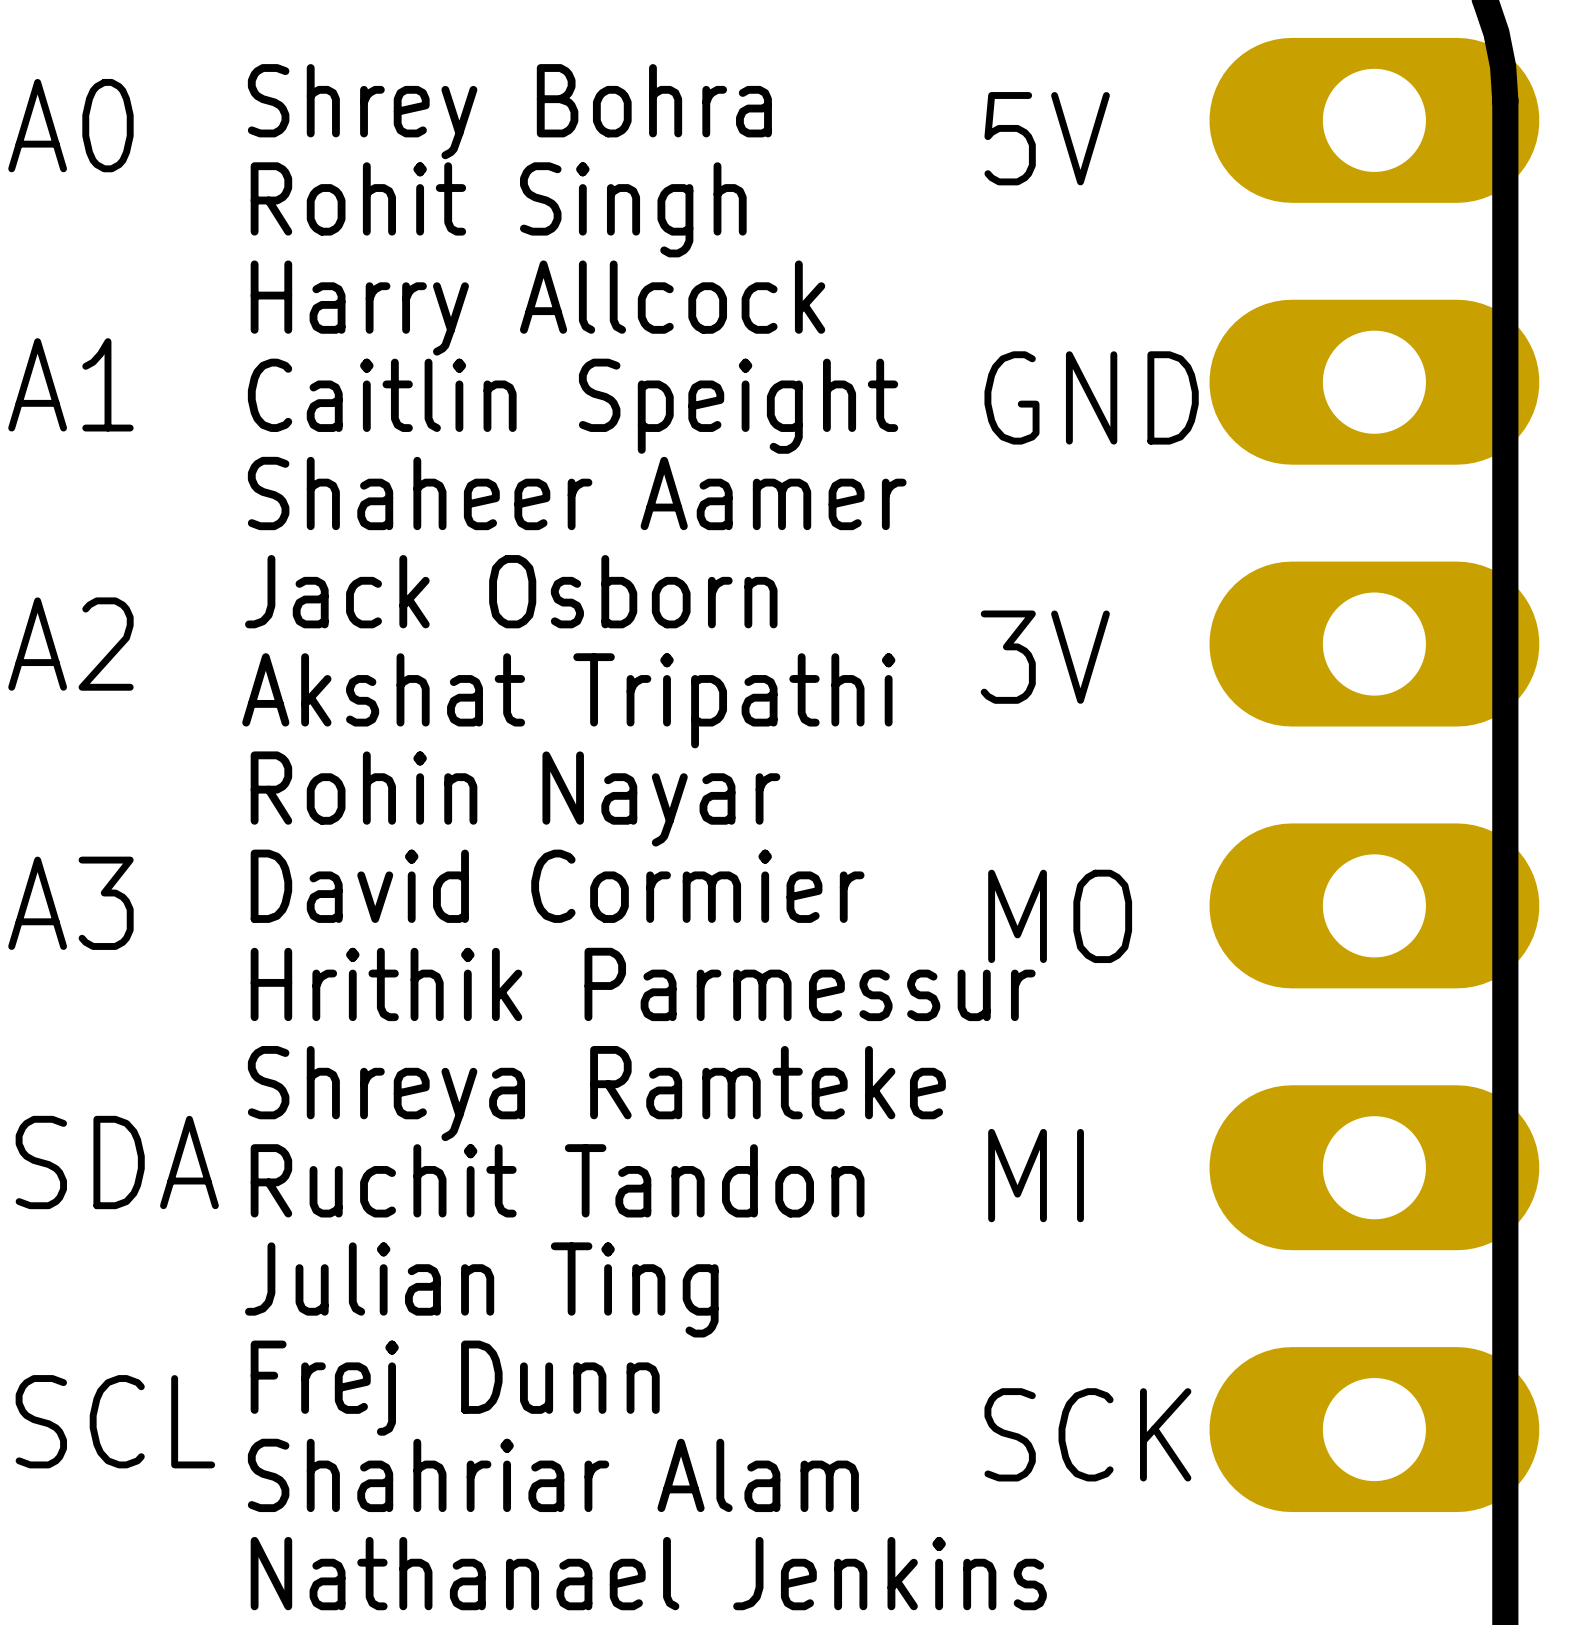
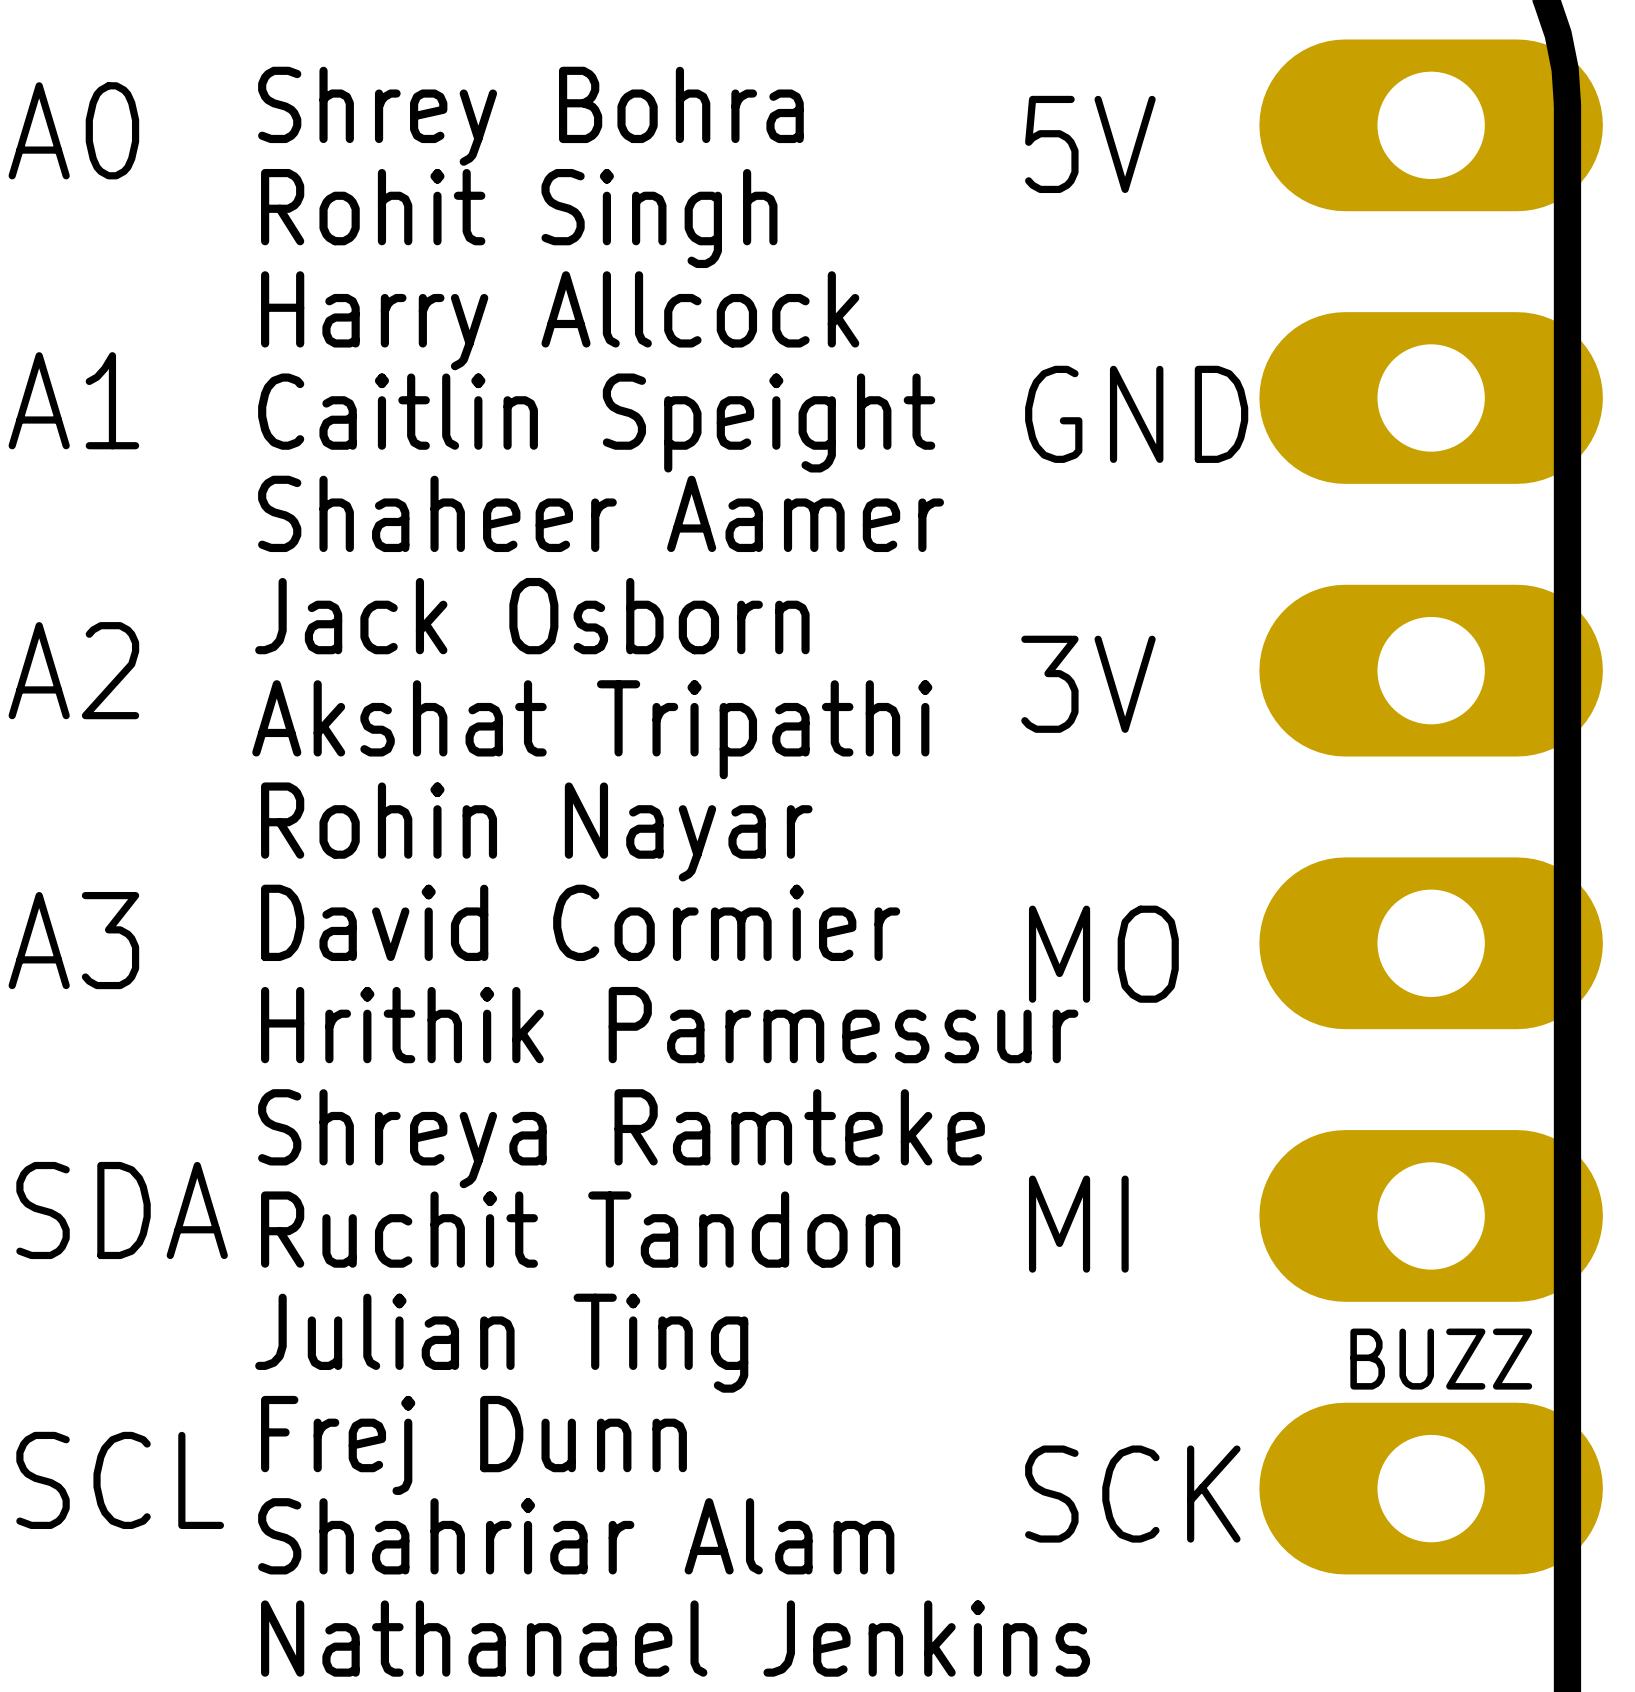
text: none -> BUZZ (1441, 1359)

